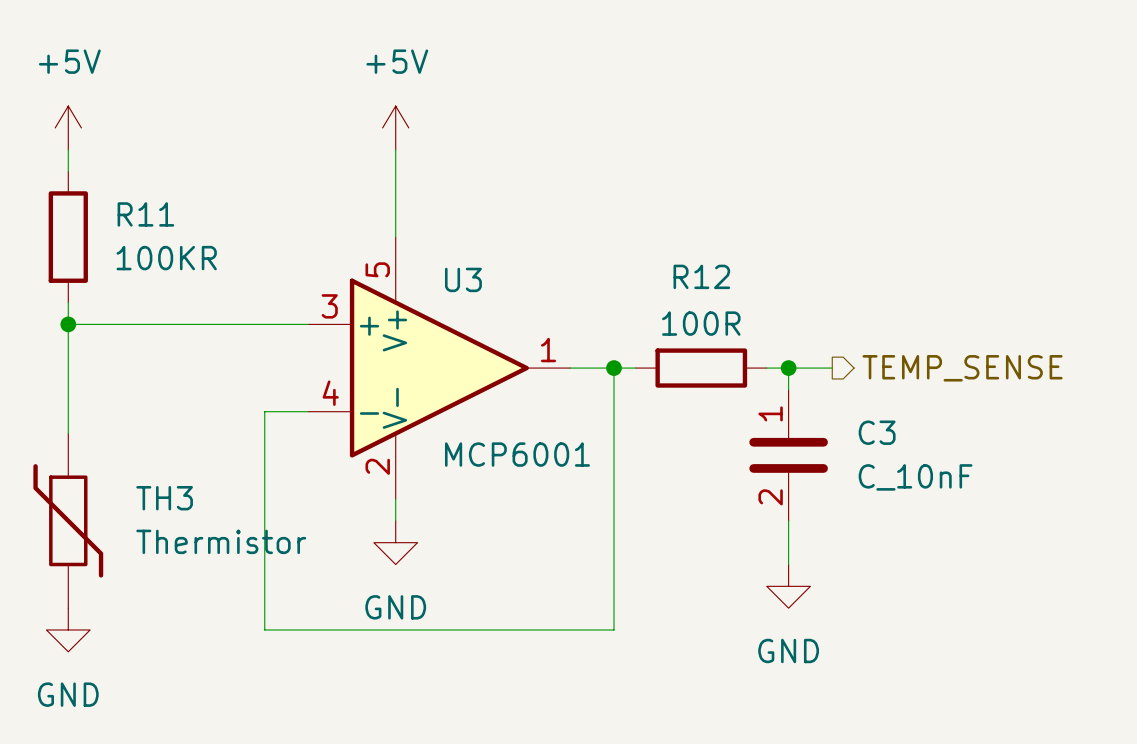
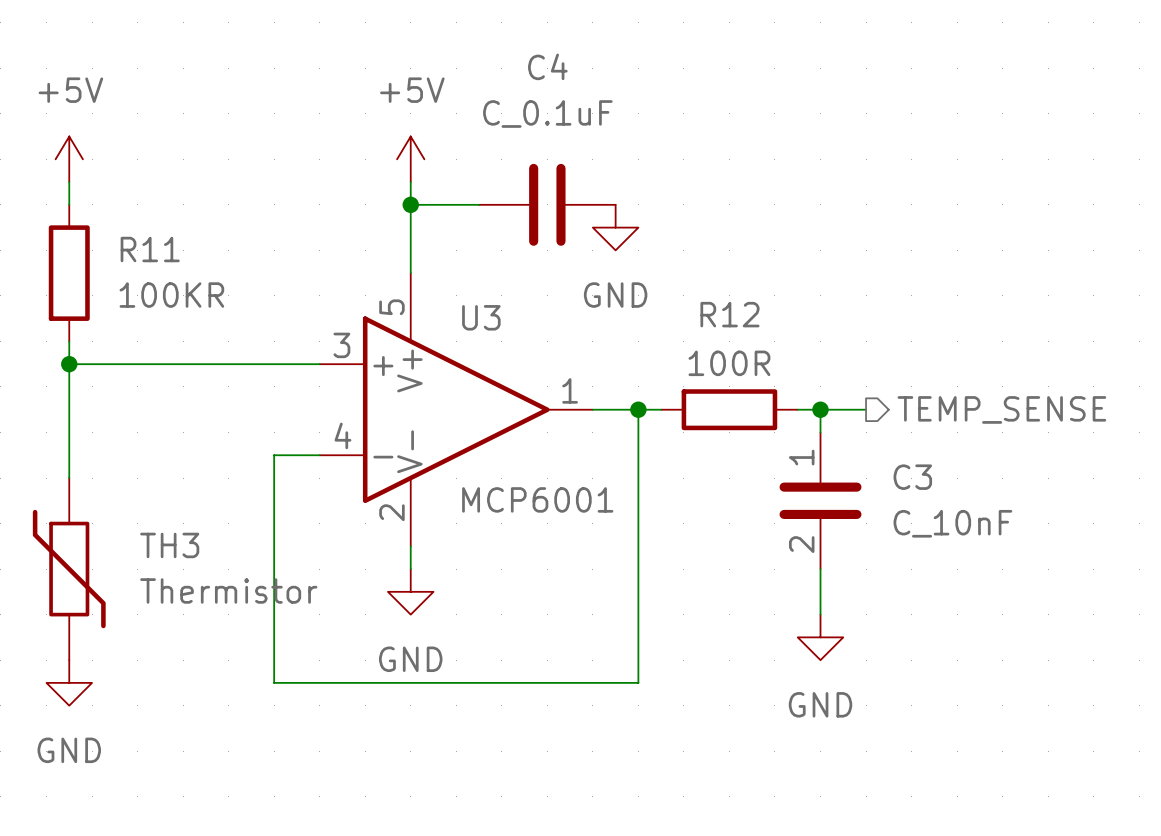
wire: none -> (410, 204) (479, 204)
junction: none -> (410, 204)
C4: none -> C_0.1uF (547, 204)
power symbol: none -> GND (615, 227)

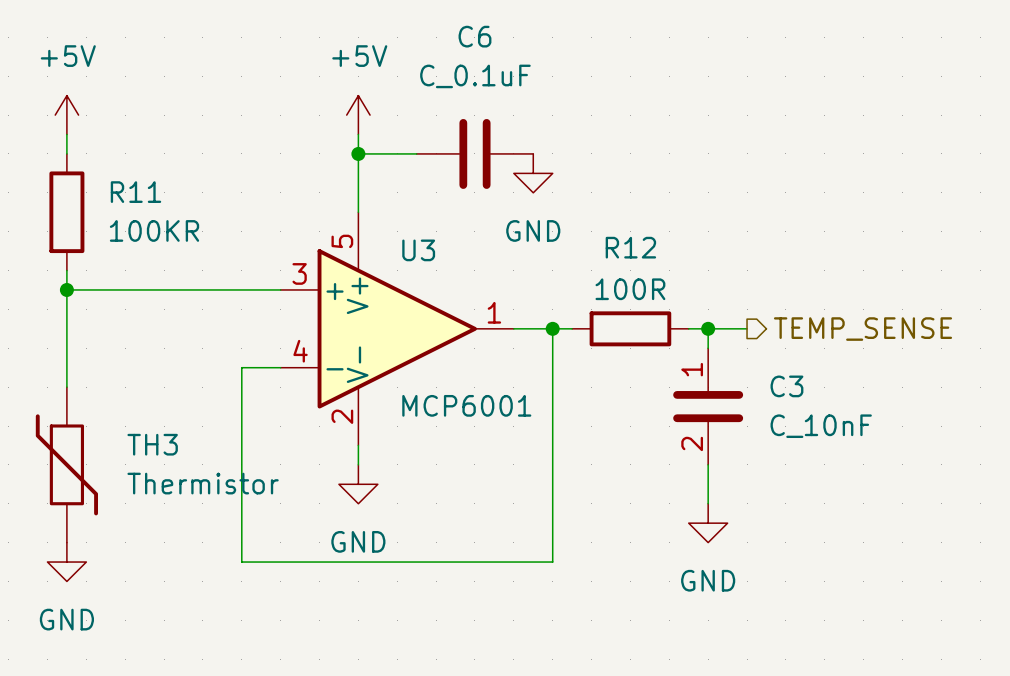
C4 name: C4 (547, 66) -> C6 (474, 36)

